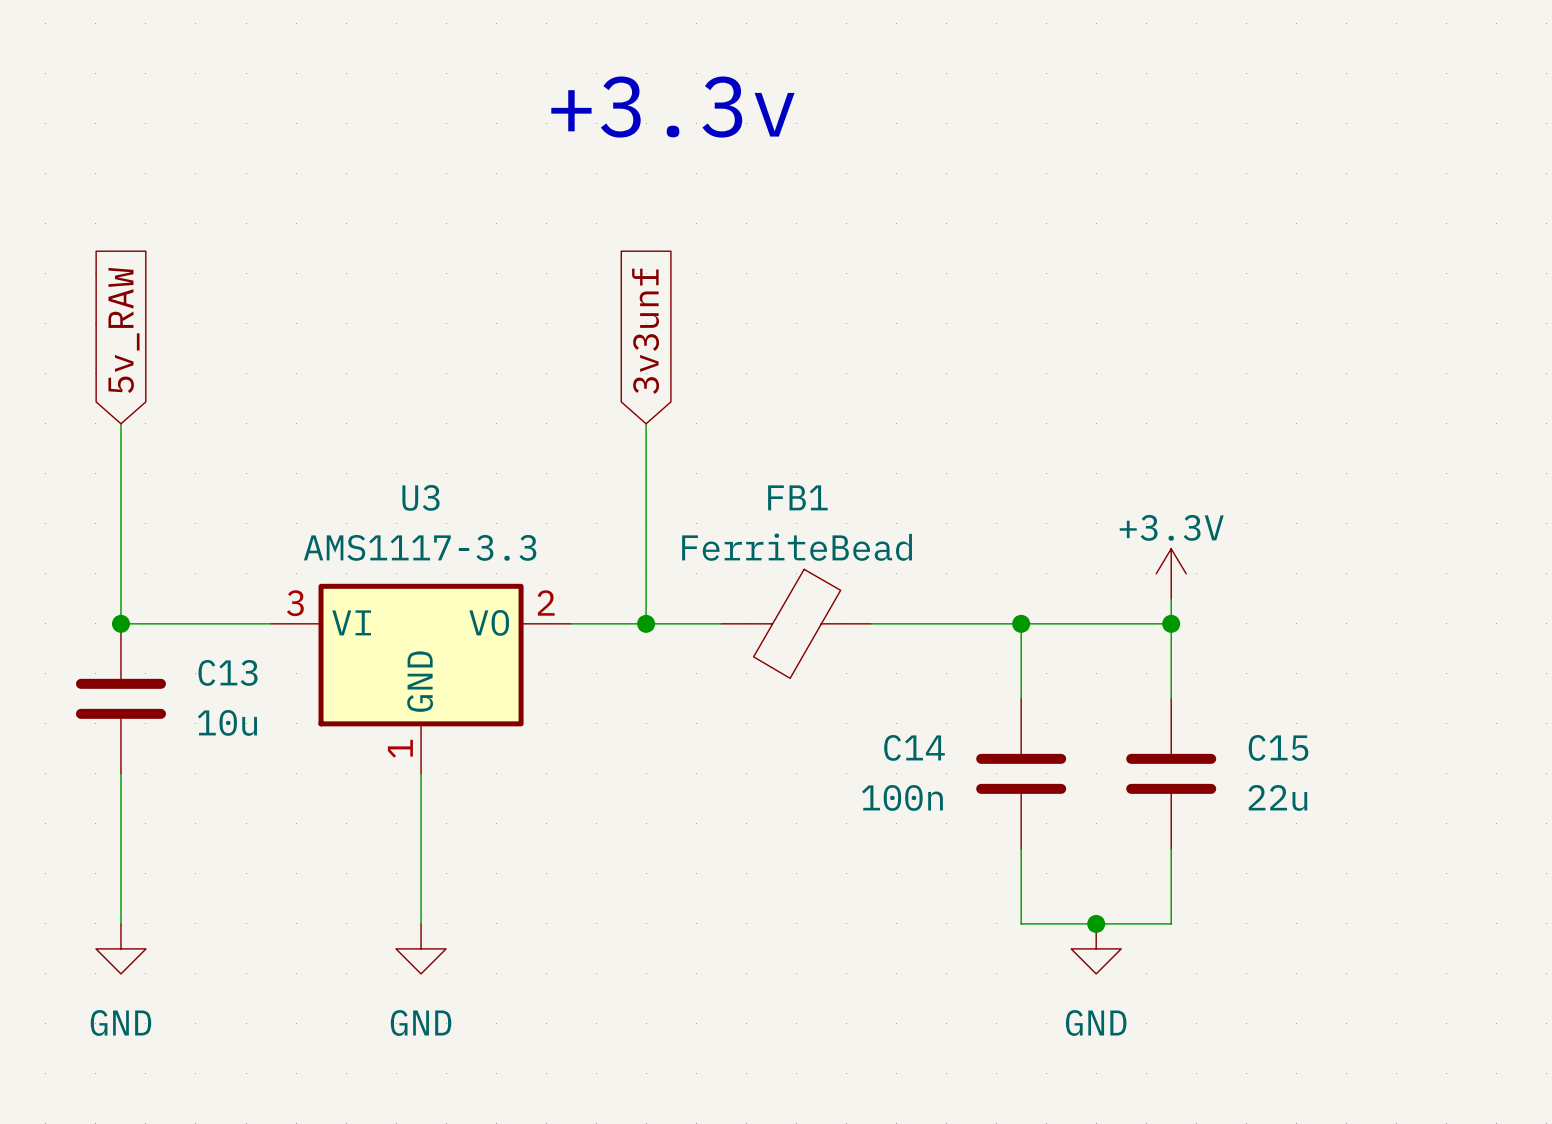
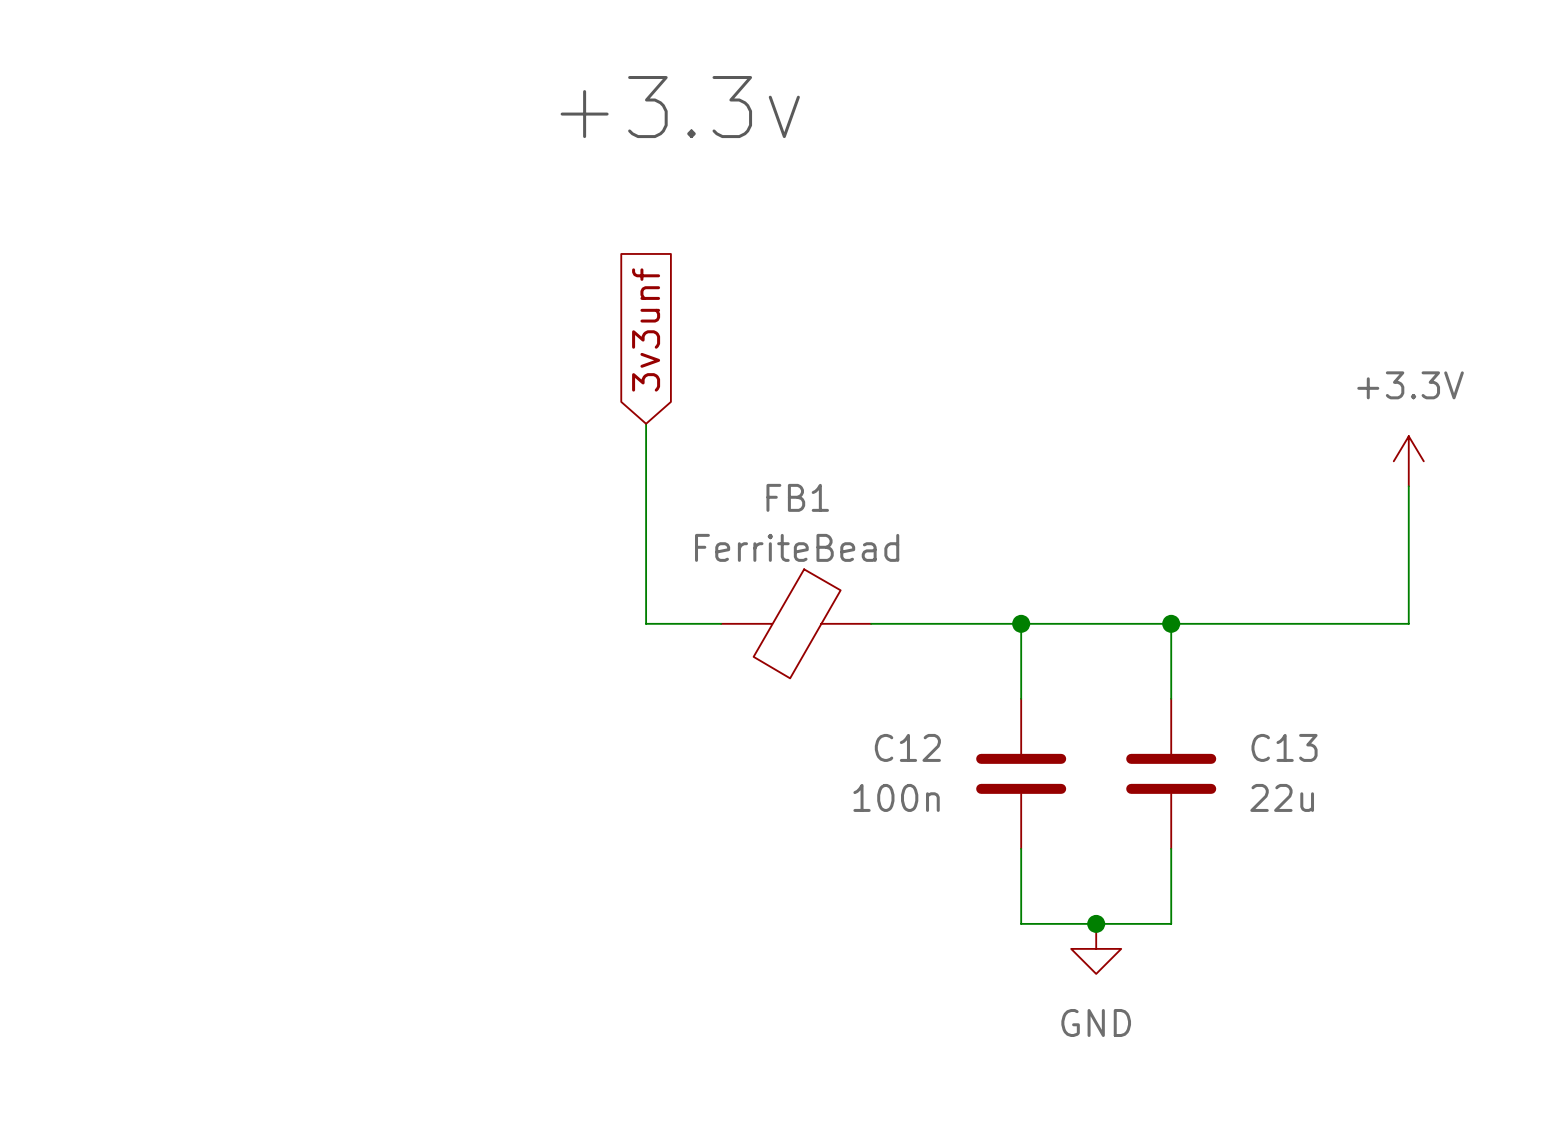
global label: 5v_RAW (123, 330) -> none
wire: (120, 423) (120, 623) (271, 623) -> none
power symbol text position: +3.3V (1171, 527) -> +3.3V (1410, 385)
power symbol position: +3.3V (1171, 573) -> +3.3V (1408, 461)
wire: (1171, 598) (1171, 623) -> (1408, 486) (1408, 623) (1171, 623)
junction: (120, 623) -> none
wire: (571, 623) (646, 623) -> none
junction: (646, 623) -> none
U3: AMS1117-3.3 (421, 678) -> none
C13: 10u (120, 698) -> none
C14 name: C14 (914, 747) -> C12 (907, 747)
C15 name: C15 (1278, 747) -> C13 (1284, 747)
wire: (120, 773) (120, 923) -> none
wire: (421, 773) (421, 923) -> none
power symbol: GND (120, 948) -> none
power symbol: GND (421, 948) -> none

